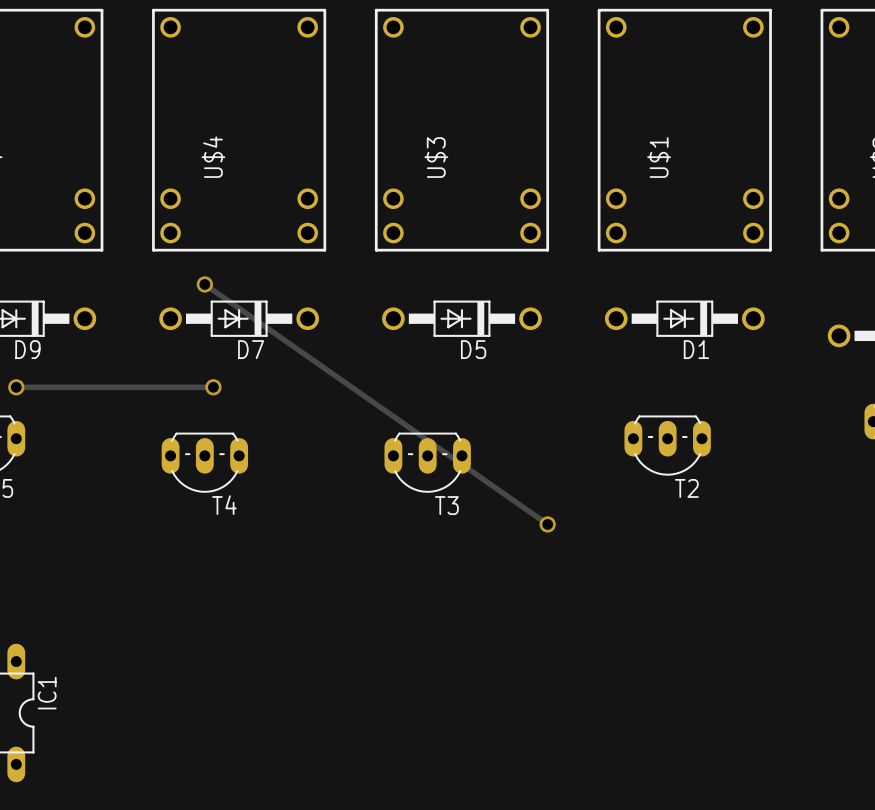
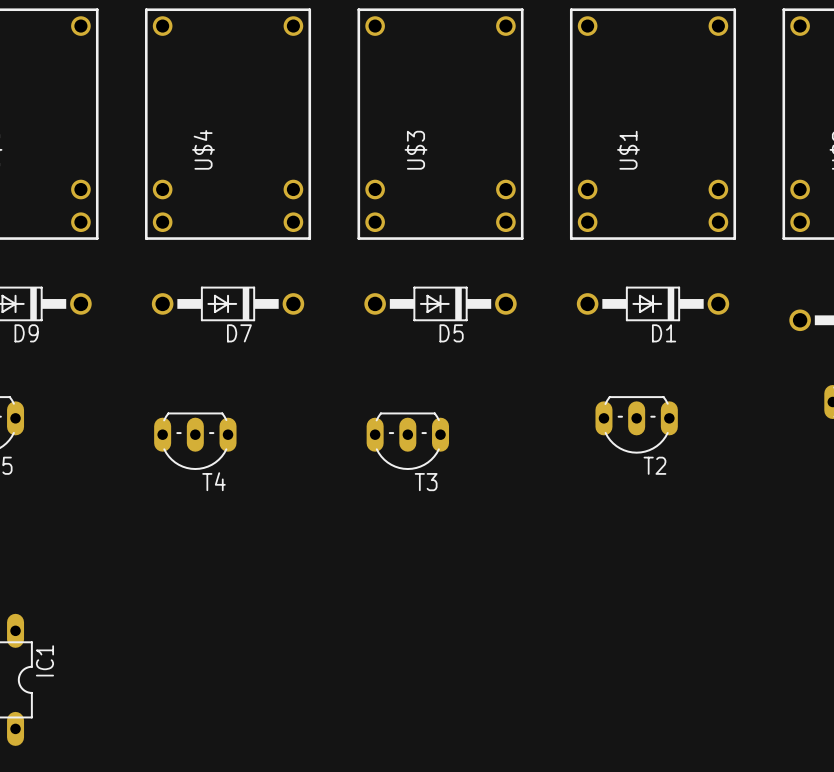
track: (204, 284) (547, 524) -> none
via: (204, 284) -> none
track: (16, 387) (213, 387) -> none
via: (16, 387) -> none
via: (213, 387) -> none
via: (547, 524) -> none

